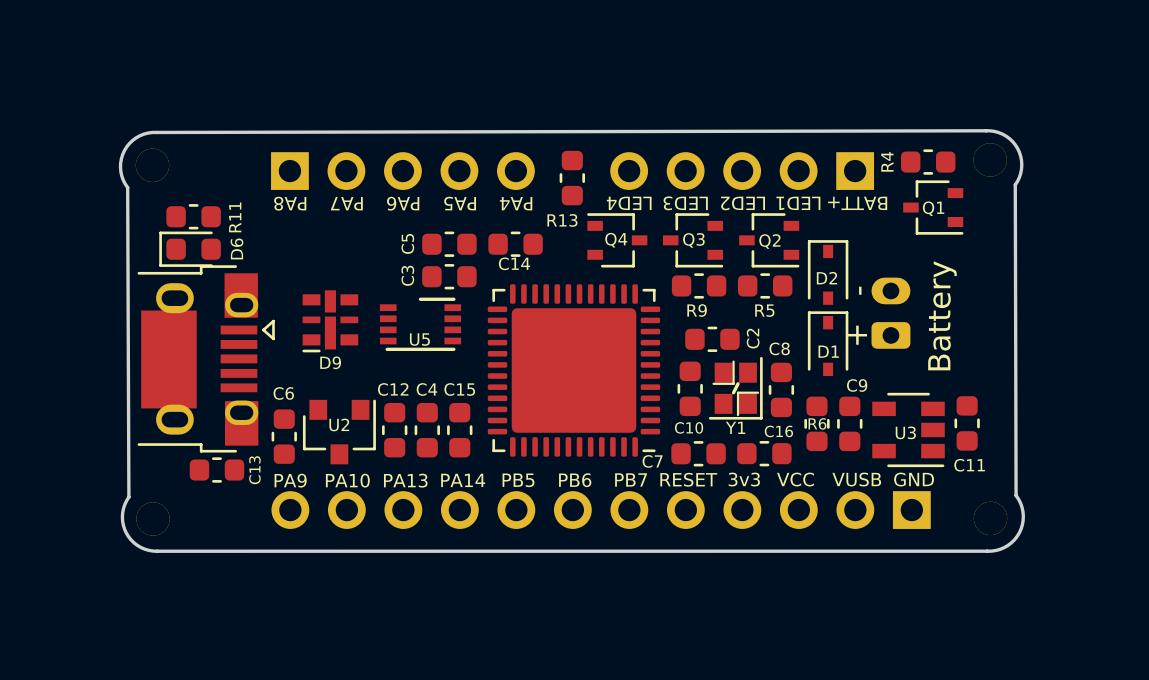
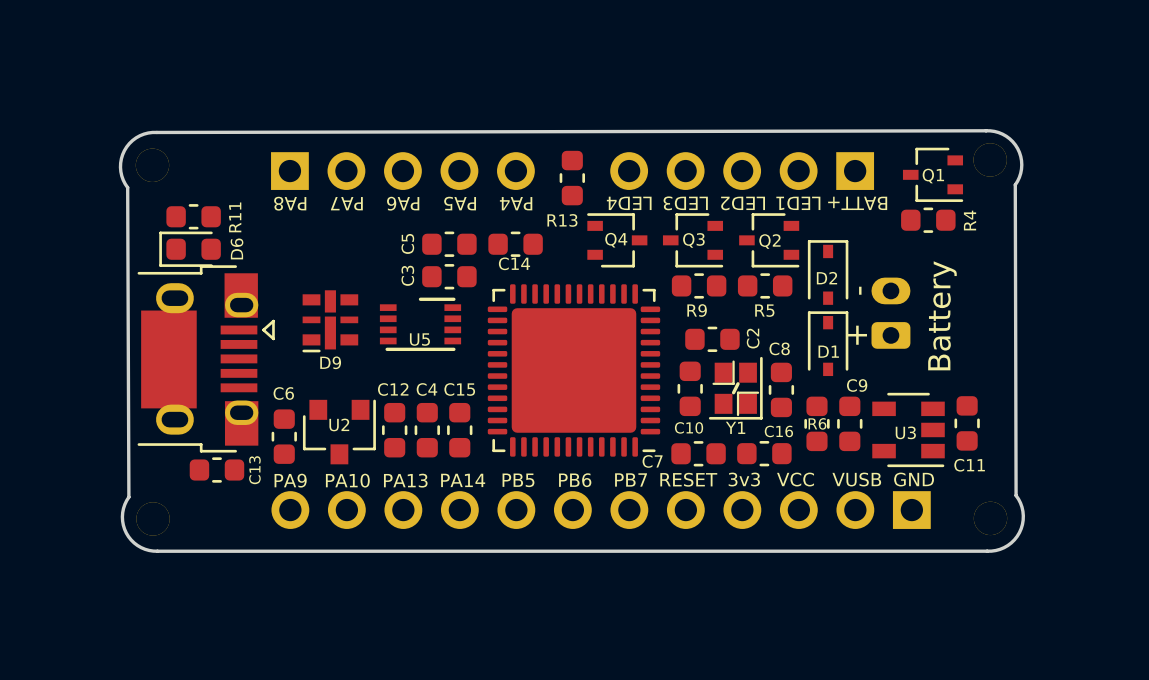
R4 name position: R4 (887, 161) -> R4 (970, 220)
R4 position: (928, 162) -> (928, 220)
Q1 position: (933, 207) -> (933, 174)

